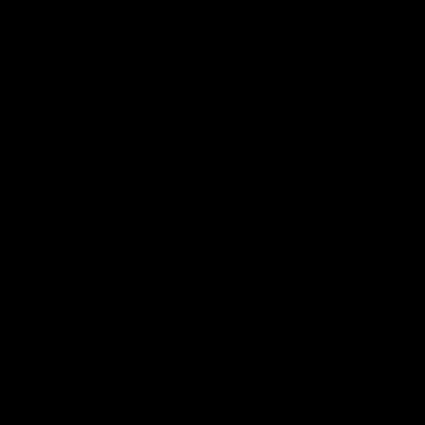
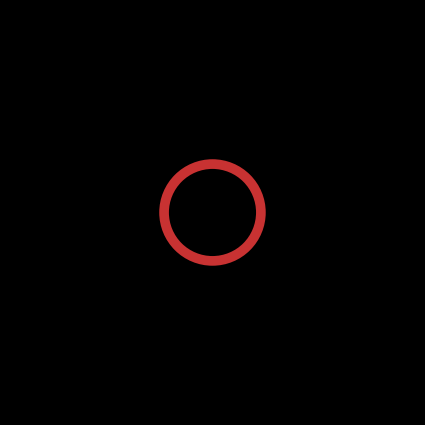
part: none -> (212, 212)

